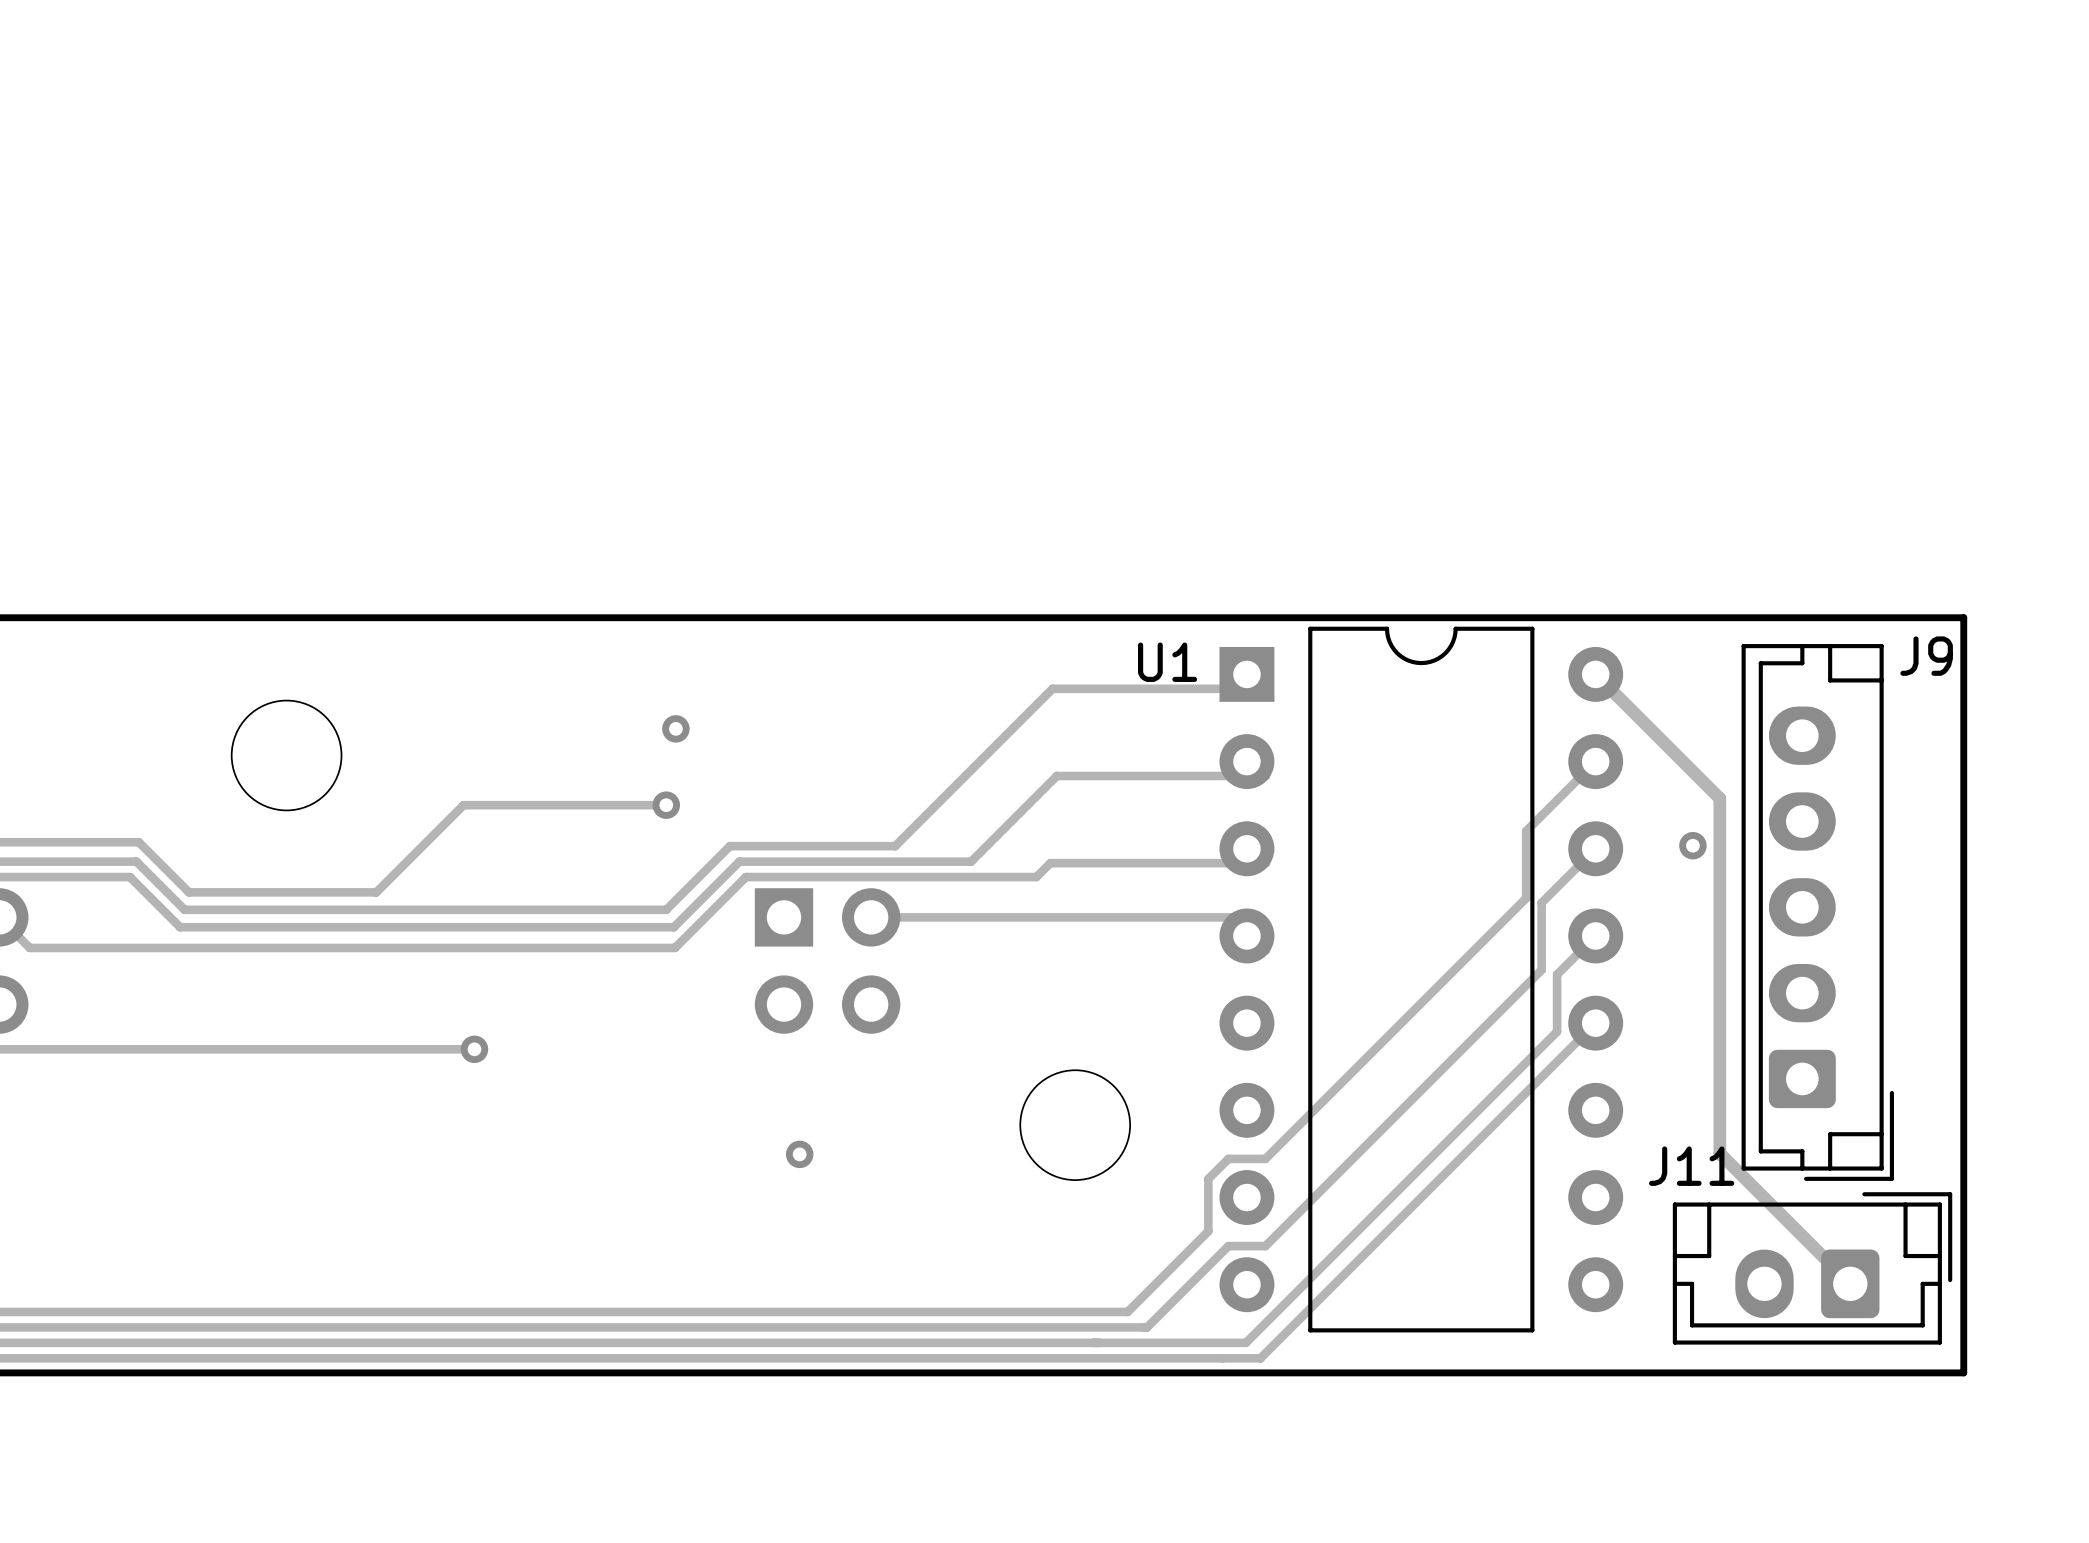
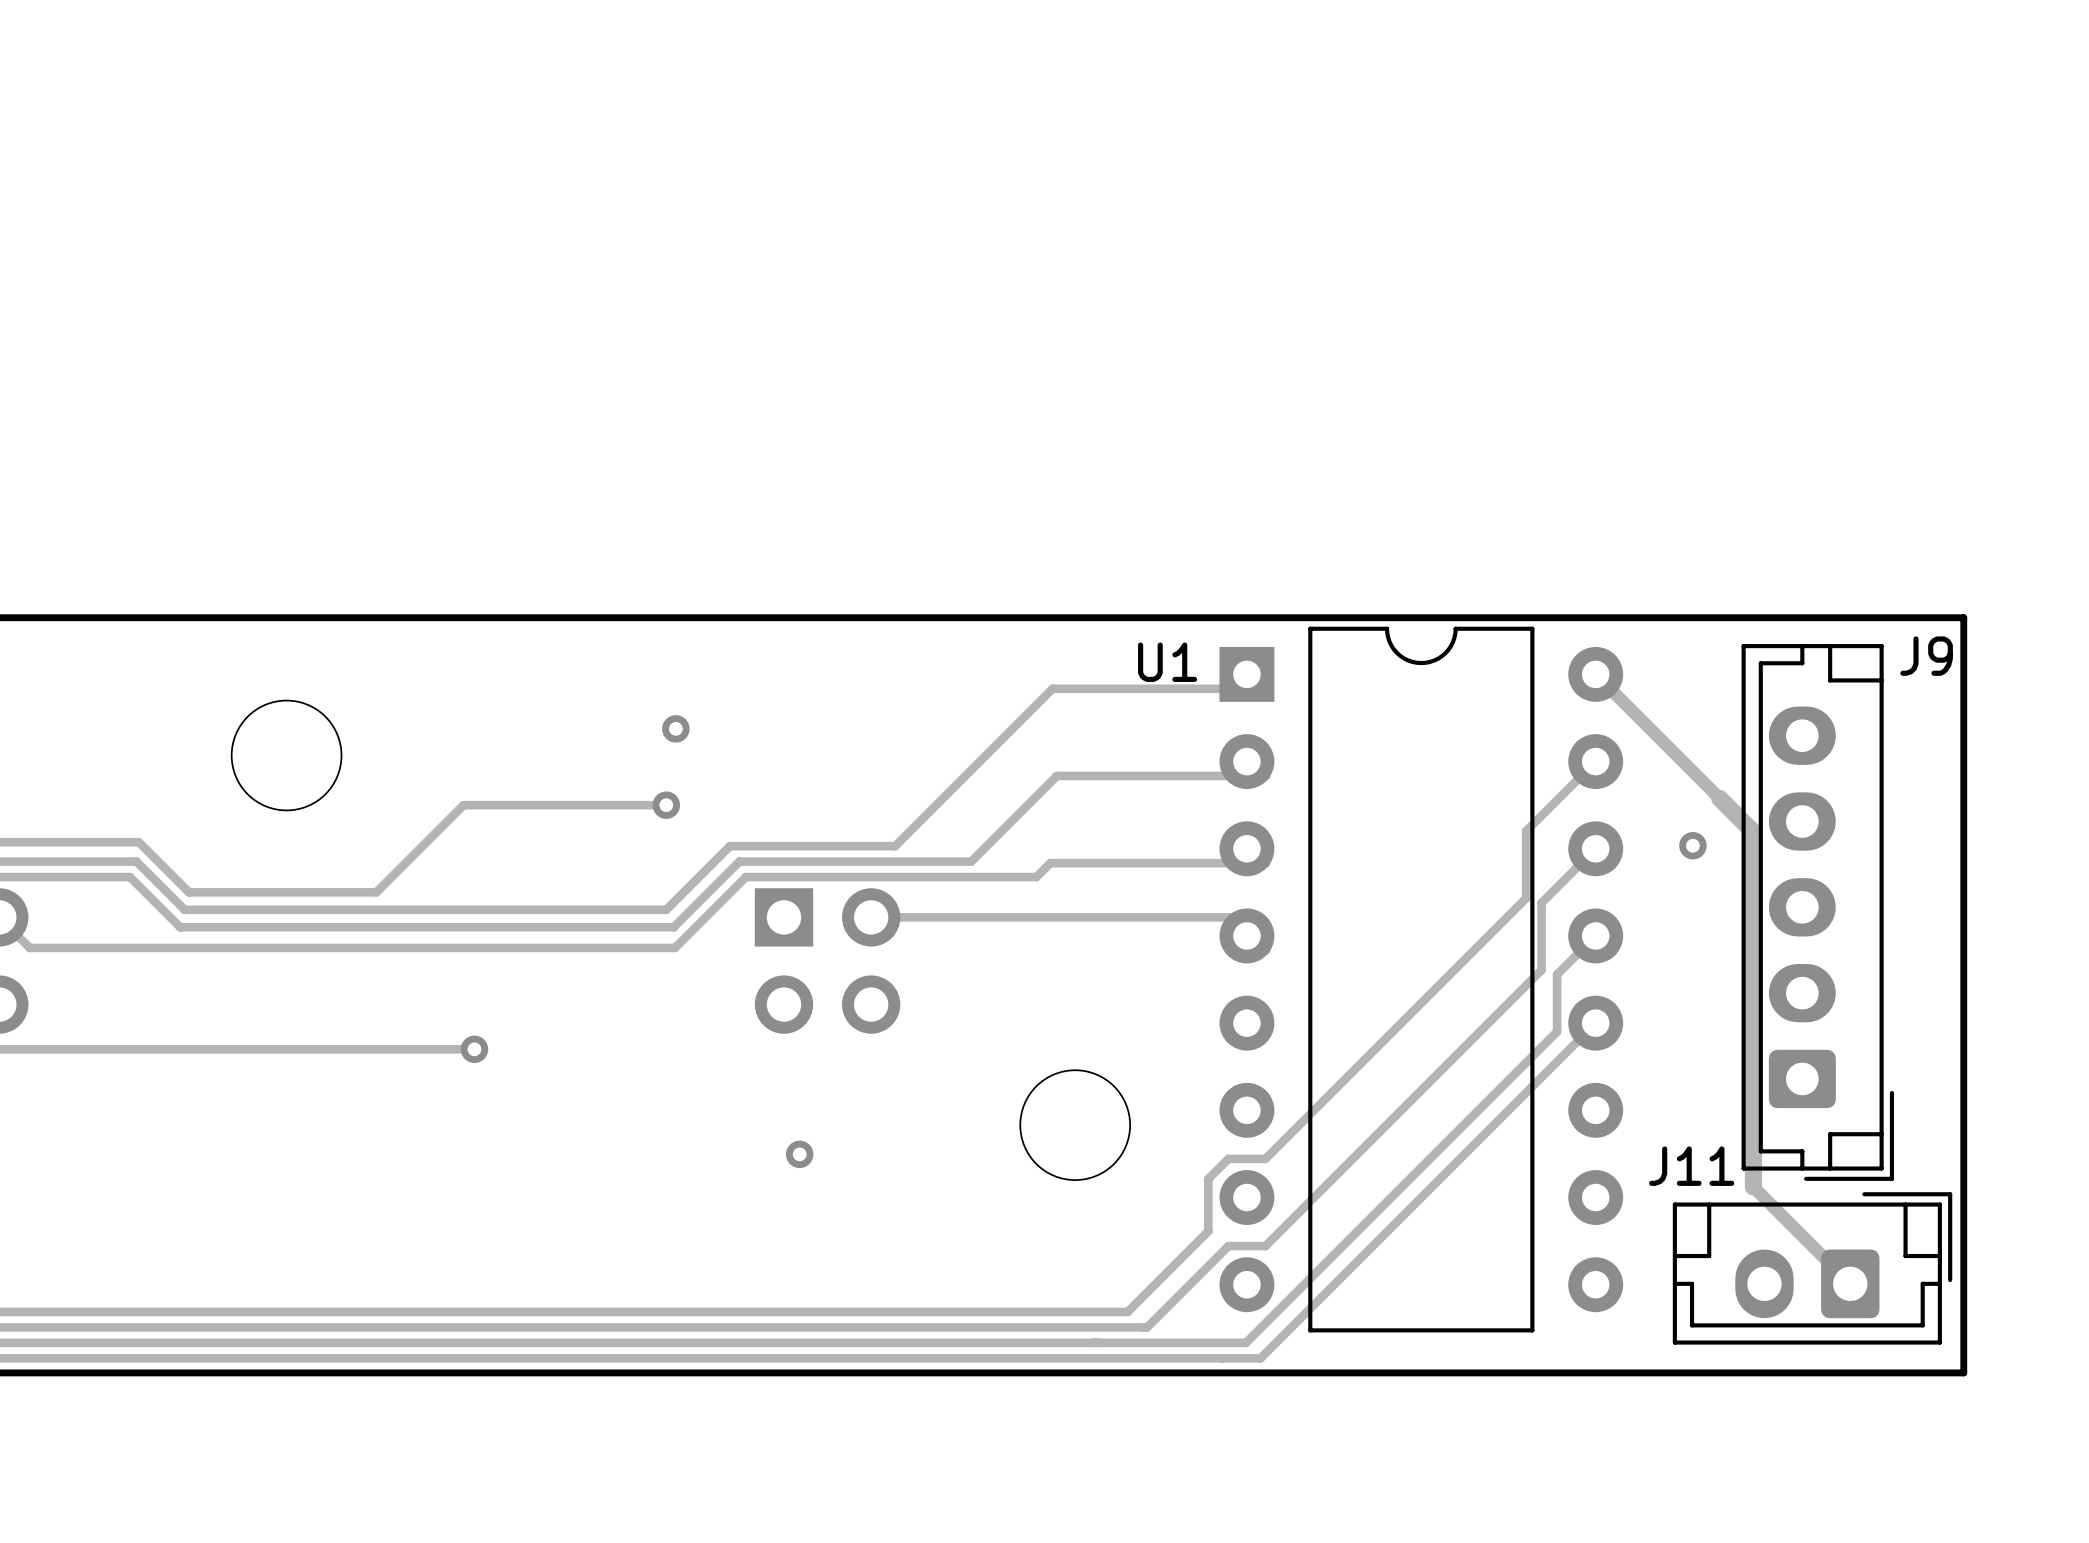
track: (1719, 798) (1719, 1153) (1753, 1186) -> (1719, 798) (1753, 832) (1753, 1186)

